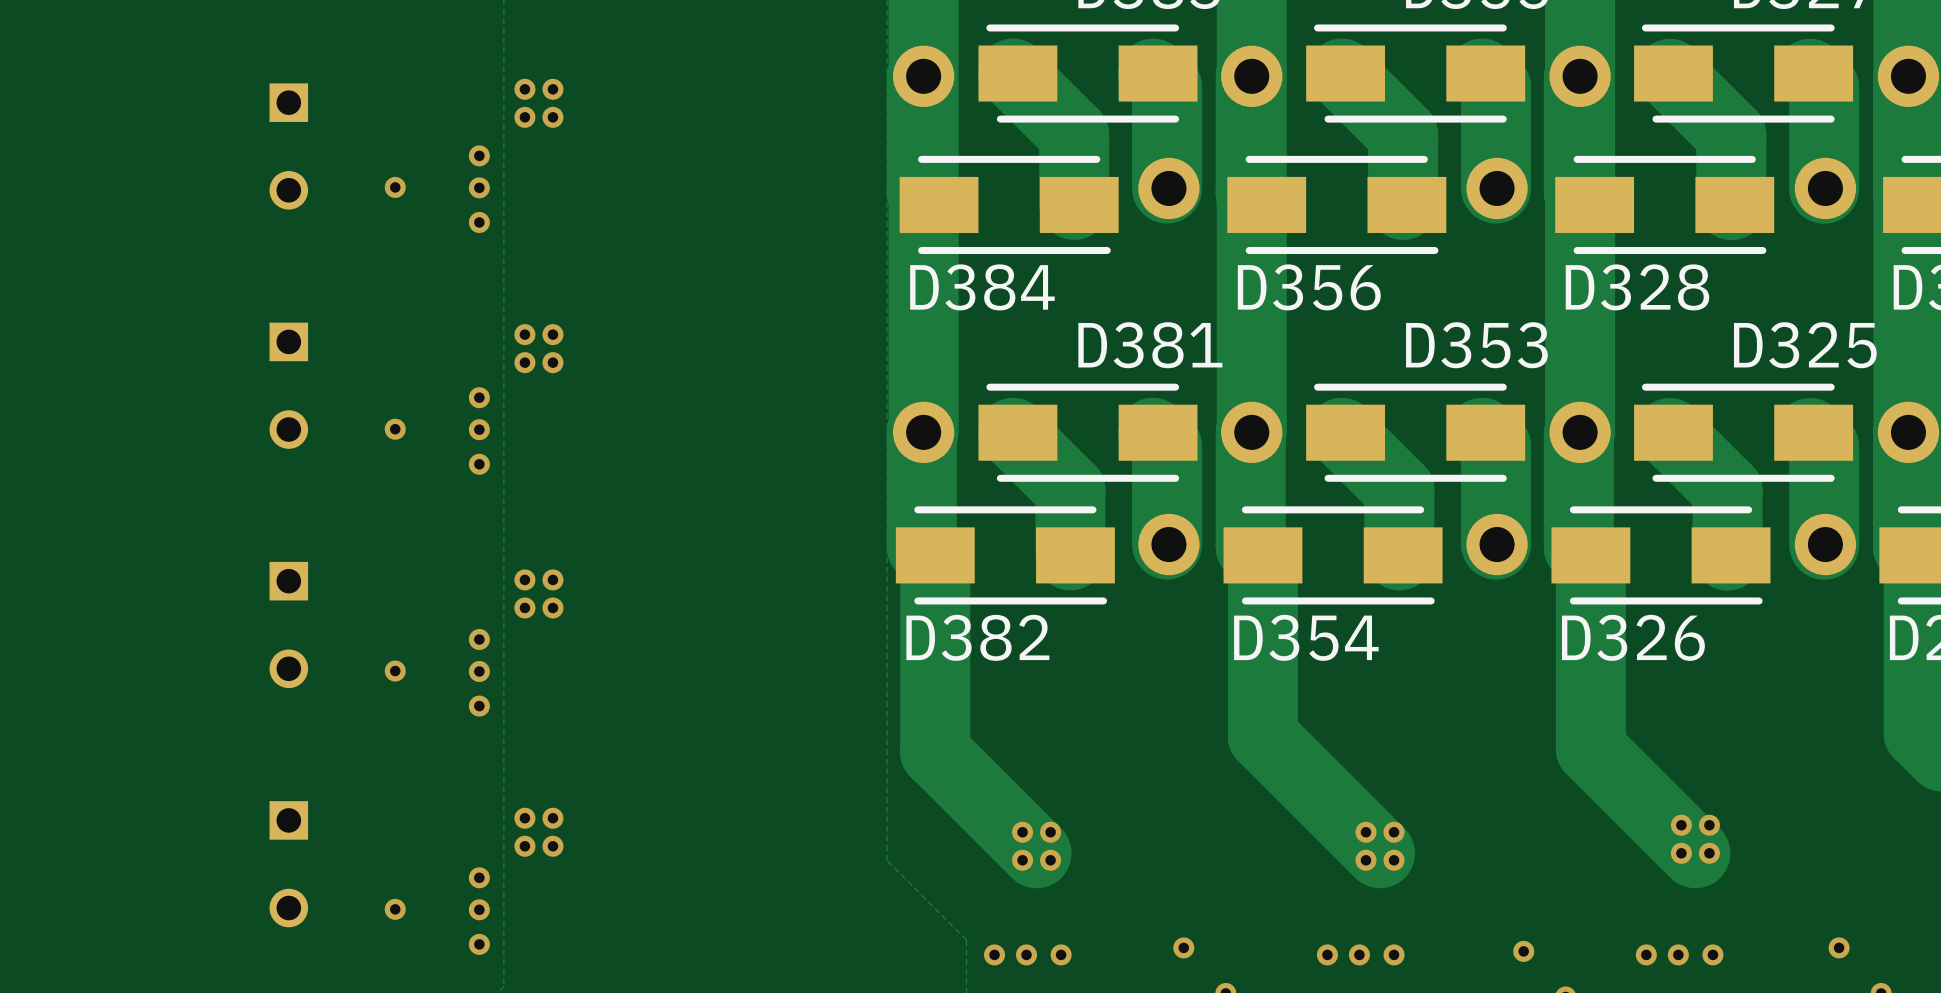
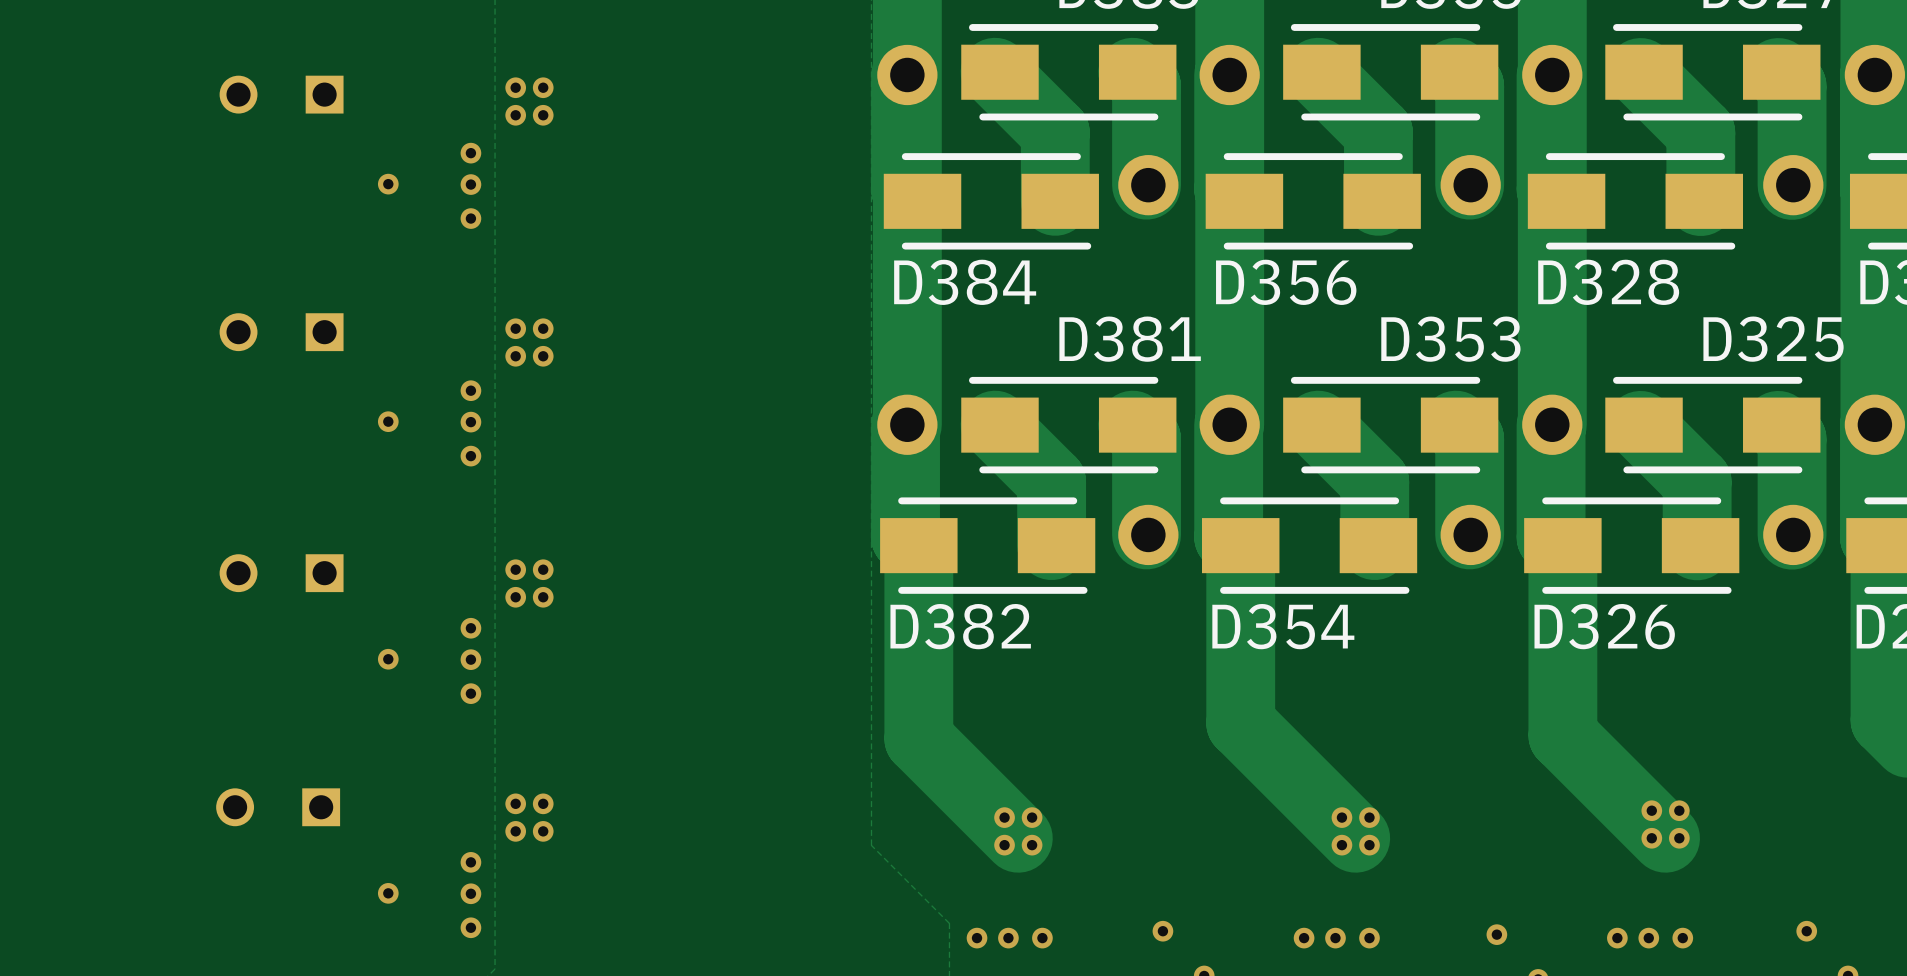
part rotation: 0° (288, 146) -> 90° clockwise (281, 94)
part rotation: 0° (288, 385) -> 90° clockwise (281, 332)
part rotation: 0° (288, 624) -> 90° clockwise (281, 573)
part rotation: 0° (288, 864) -> 90° clockwise (278, 807)

